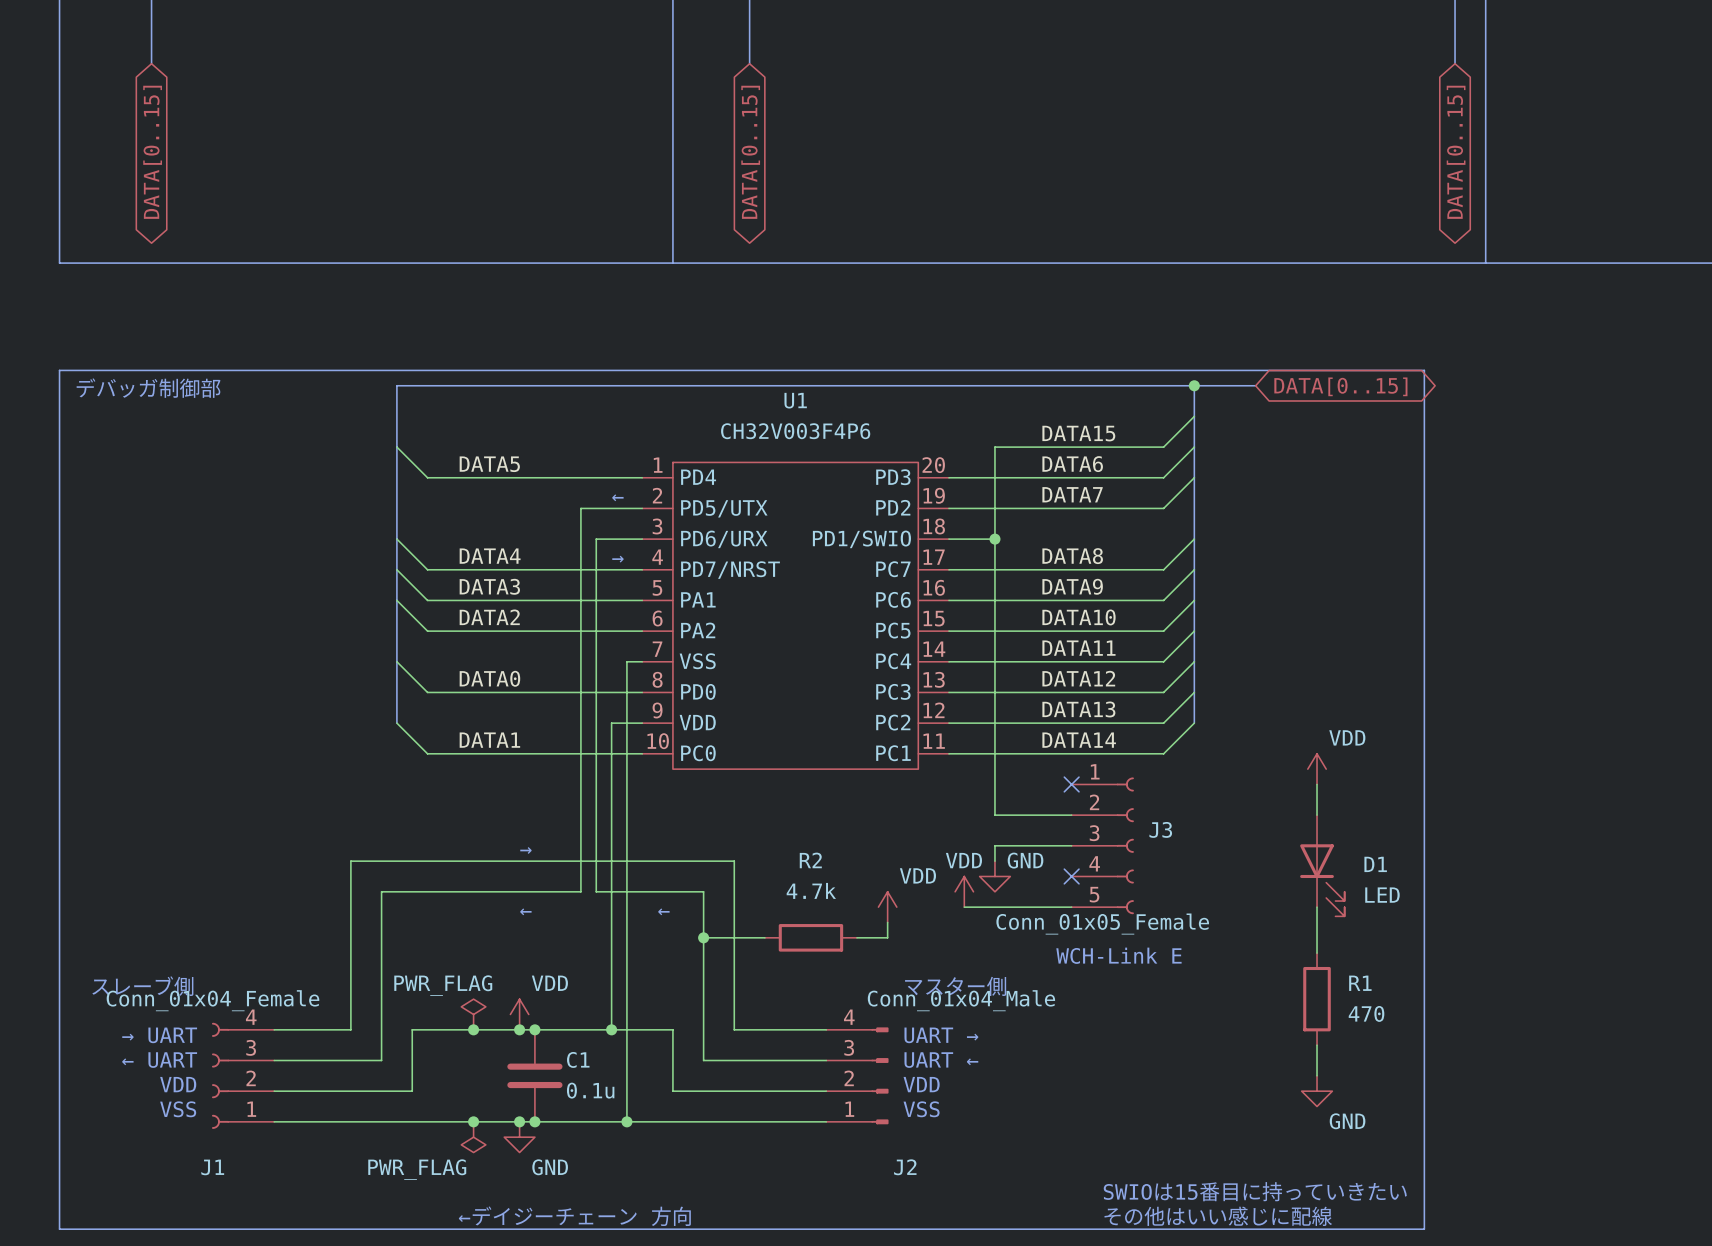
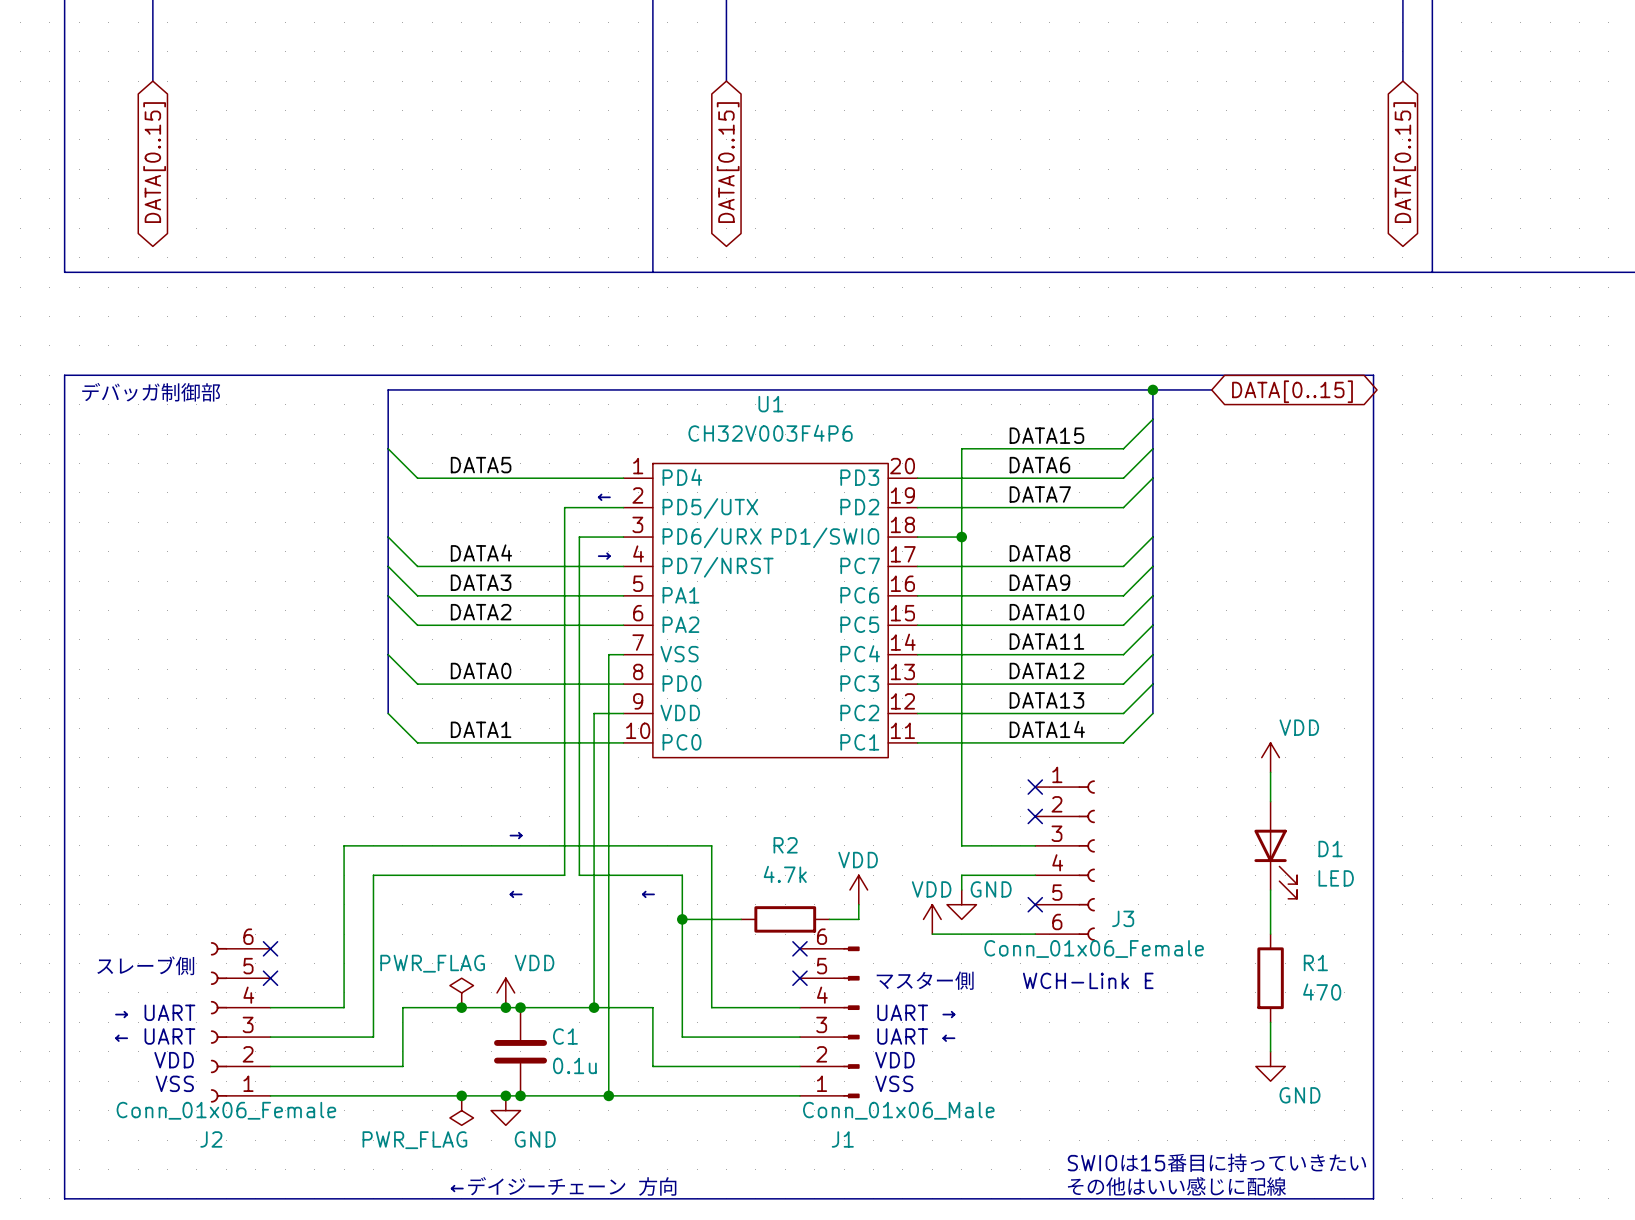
J3 symbol: [1071, 777, 1134, 915] -> [1035, 780, 1095, 941]
no-connect mark position: (1071, 784) -> (1035, 787)
wire: (994, 815) (1071, 815) -> (961, 801) (961, 831)
J3 name position: J3 (1160, 829) -> J3 (1123, 918)
no-connect mark: none -> (1035, 816)
wire: (994, 845) (1071, 845) -> (961, 845) (1035, 845)
power symbol text position: VDD (917, 875) -> VDD (858, 860)
power symbol position: GND (994, 876) -> GND (961, 904)
no-connect mark: (1071, 876) -> none
power symbol position: VDD (964, 891) -> VDD (932, 919)
wire: none -> (1035, 875) (961, 875) (961, 889)
wire: (964, 907) (1071, 907) -> (932, 934) (1035, 934)
no-connect mark: none -> (1035, 904)
J3 value: Conn_01x05_Female (1102, 924) -> Conn_01x06_Female (1094, 948)
text position: WCH-Link E (1118, 955) -> WCH-Link E (1088, 980)
no-connect mark: none -> (270, 948)
no-connect mark: none -> (799, 948)
text position: マスター側 (955, 986) -> マスター側 (925, 980)
no-connect mark: none -> (270, 978)
no-connect mark: none -> (799, 978)
J1 value: Conn_01x04_Female (212, 1000) -> Conn_01x06_Male (898, 1110)
J2 value: Conn_01x04_Male (961, 1000) -> Conn_01x06_Female (226, 1110)
J1 symbol: [211, 1022, 275, 1129] -> [799, 946, 860, 1099]
J2 symbol: [826, 1027, 889, 1125] -> [210, 942, 271, 1103]
J1 name position: J1 (212, 1167) -> J1 (842, 1139)
J2 name position: J2 (905, 1167) -> J2 (211, 1139)

